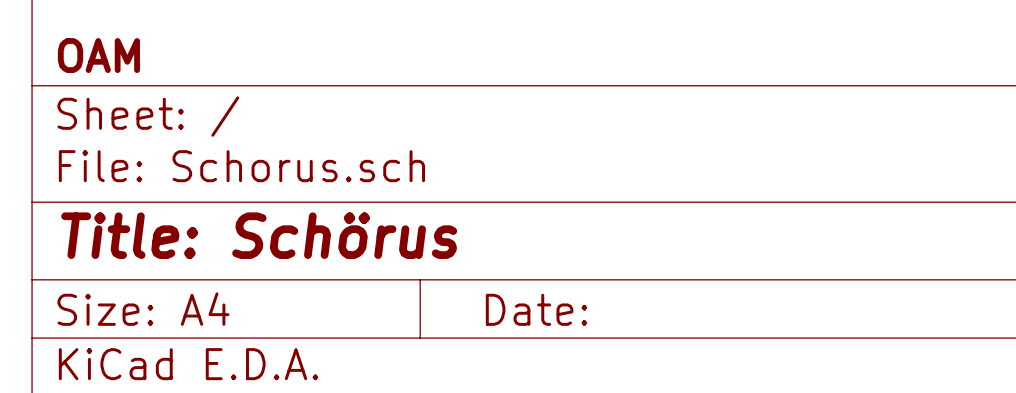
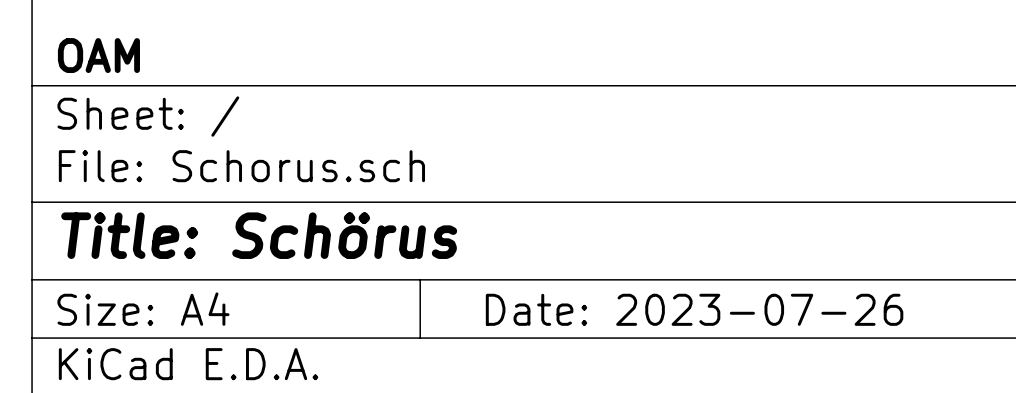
title block: Date: (536, 309) -> Date: 2023-07-26 (694, 309)

